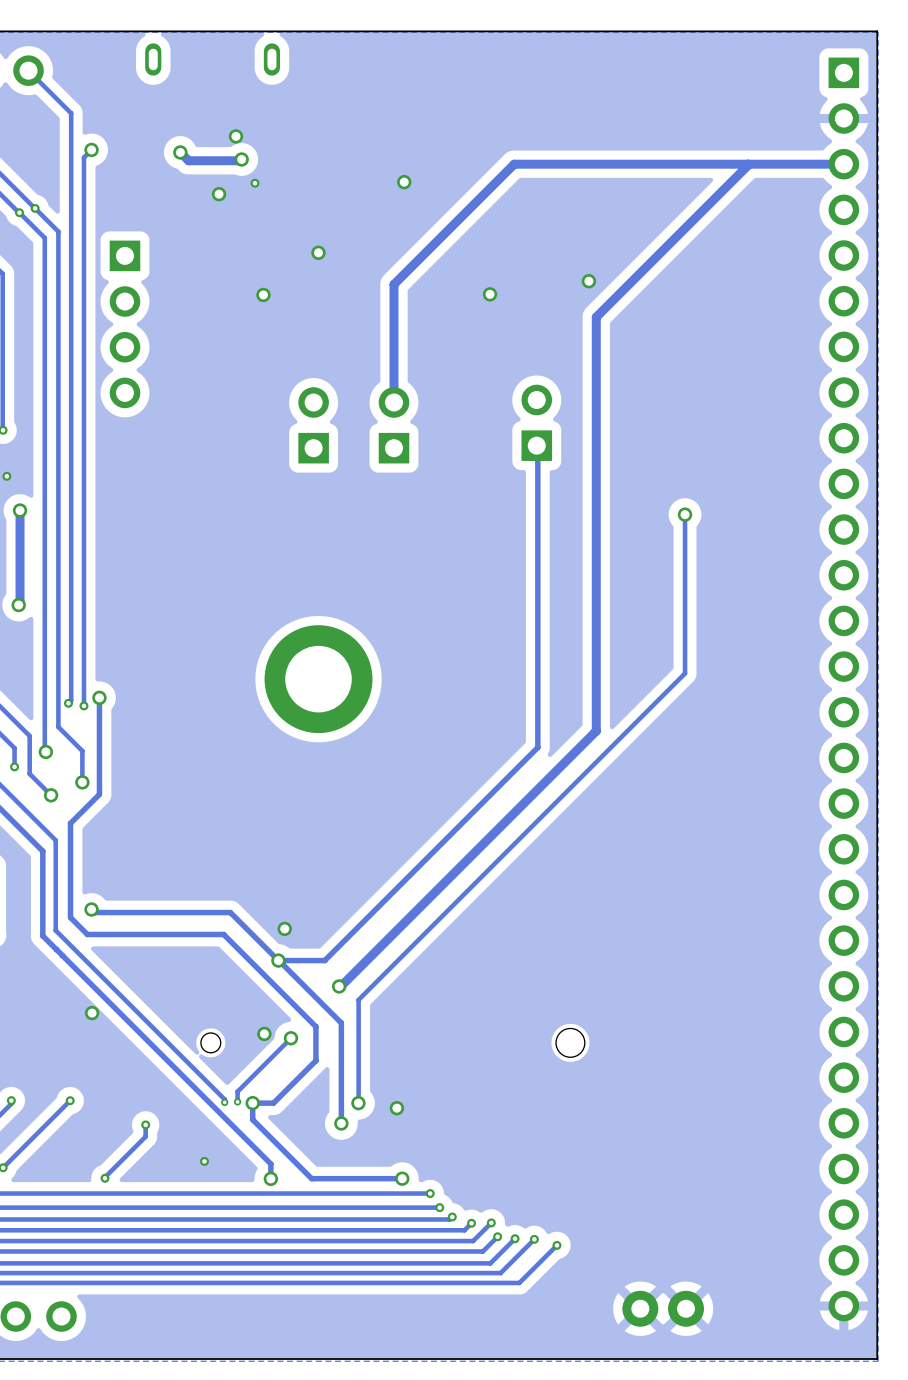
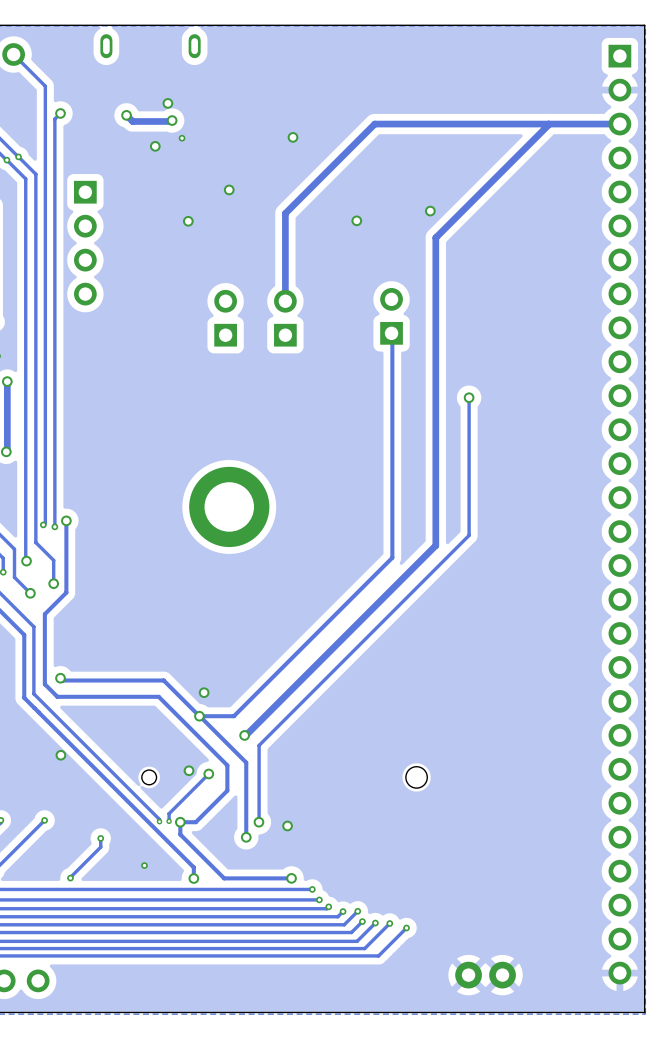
track: (685, 514) (685, 673) (641, 717) -> (469, 397) (469, 535)
via position: (685, 514) -> (469, 397)

